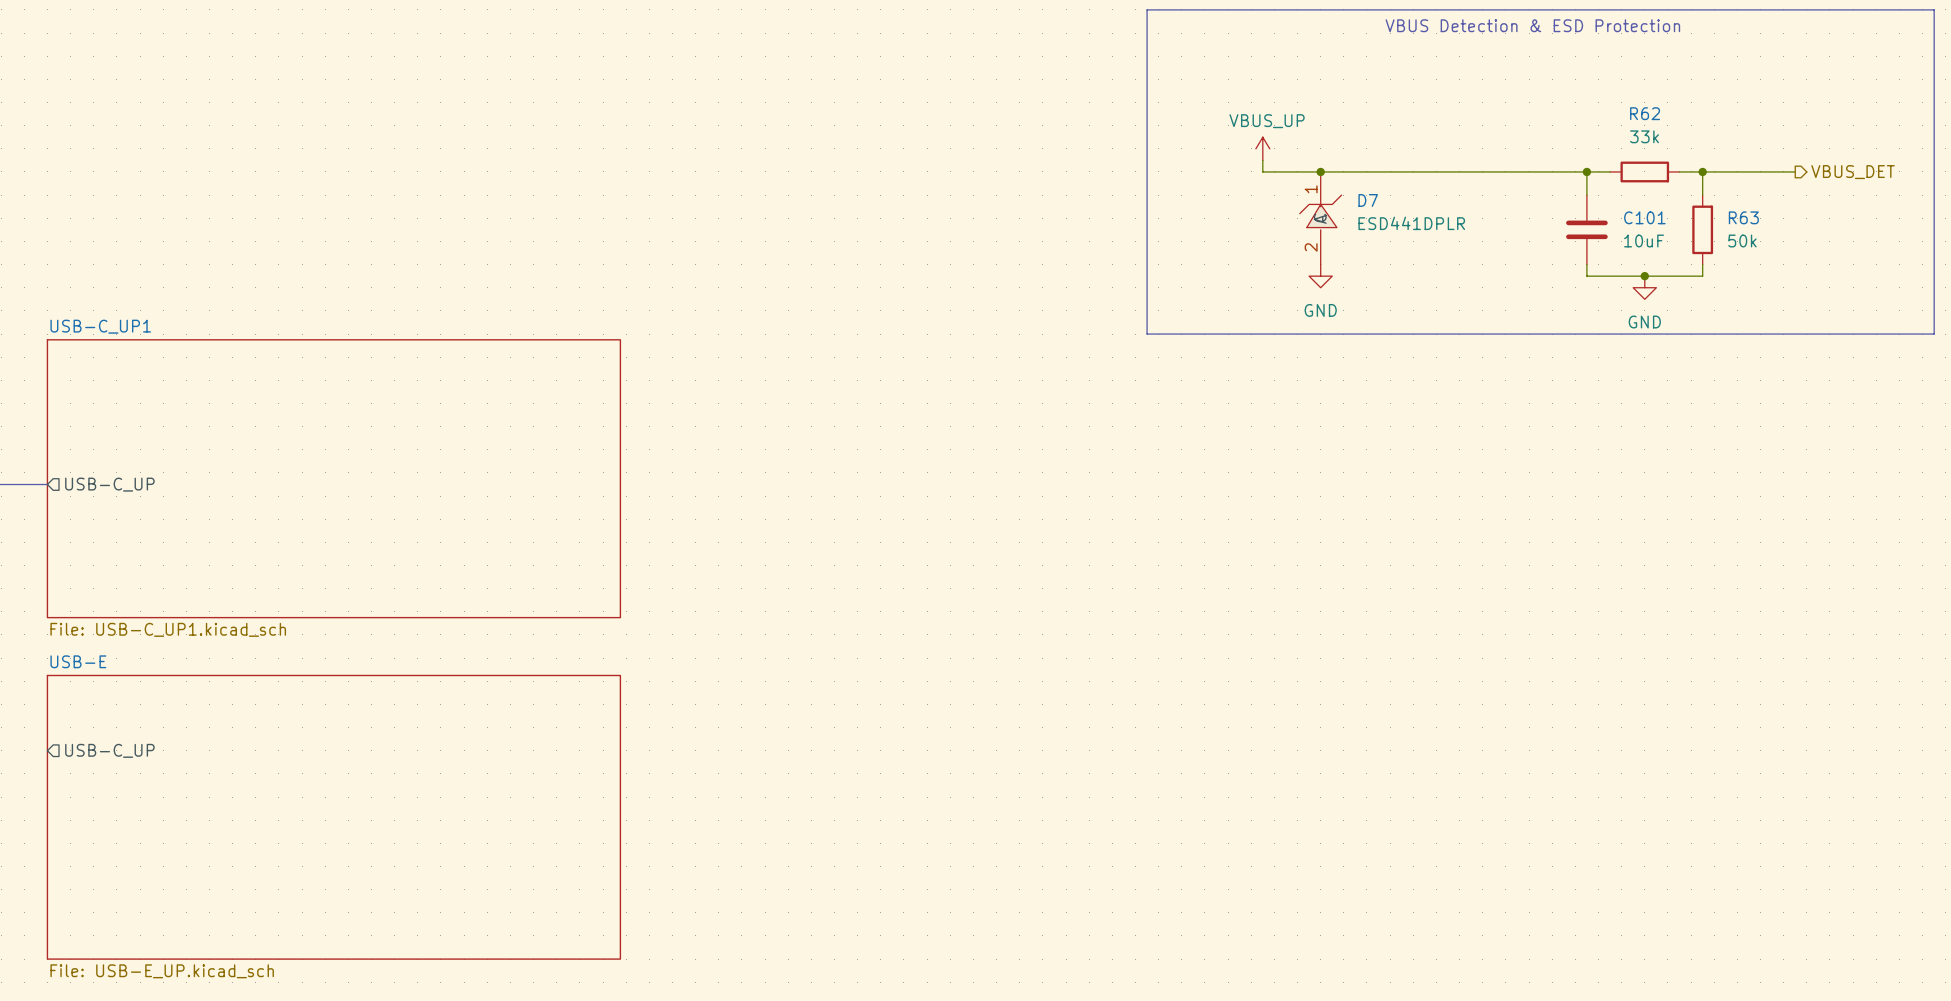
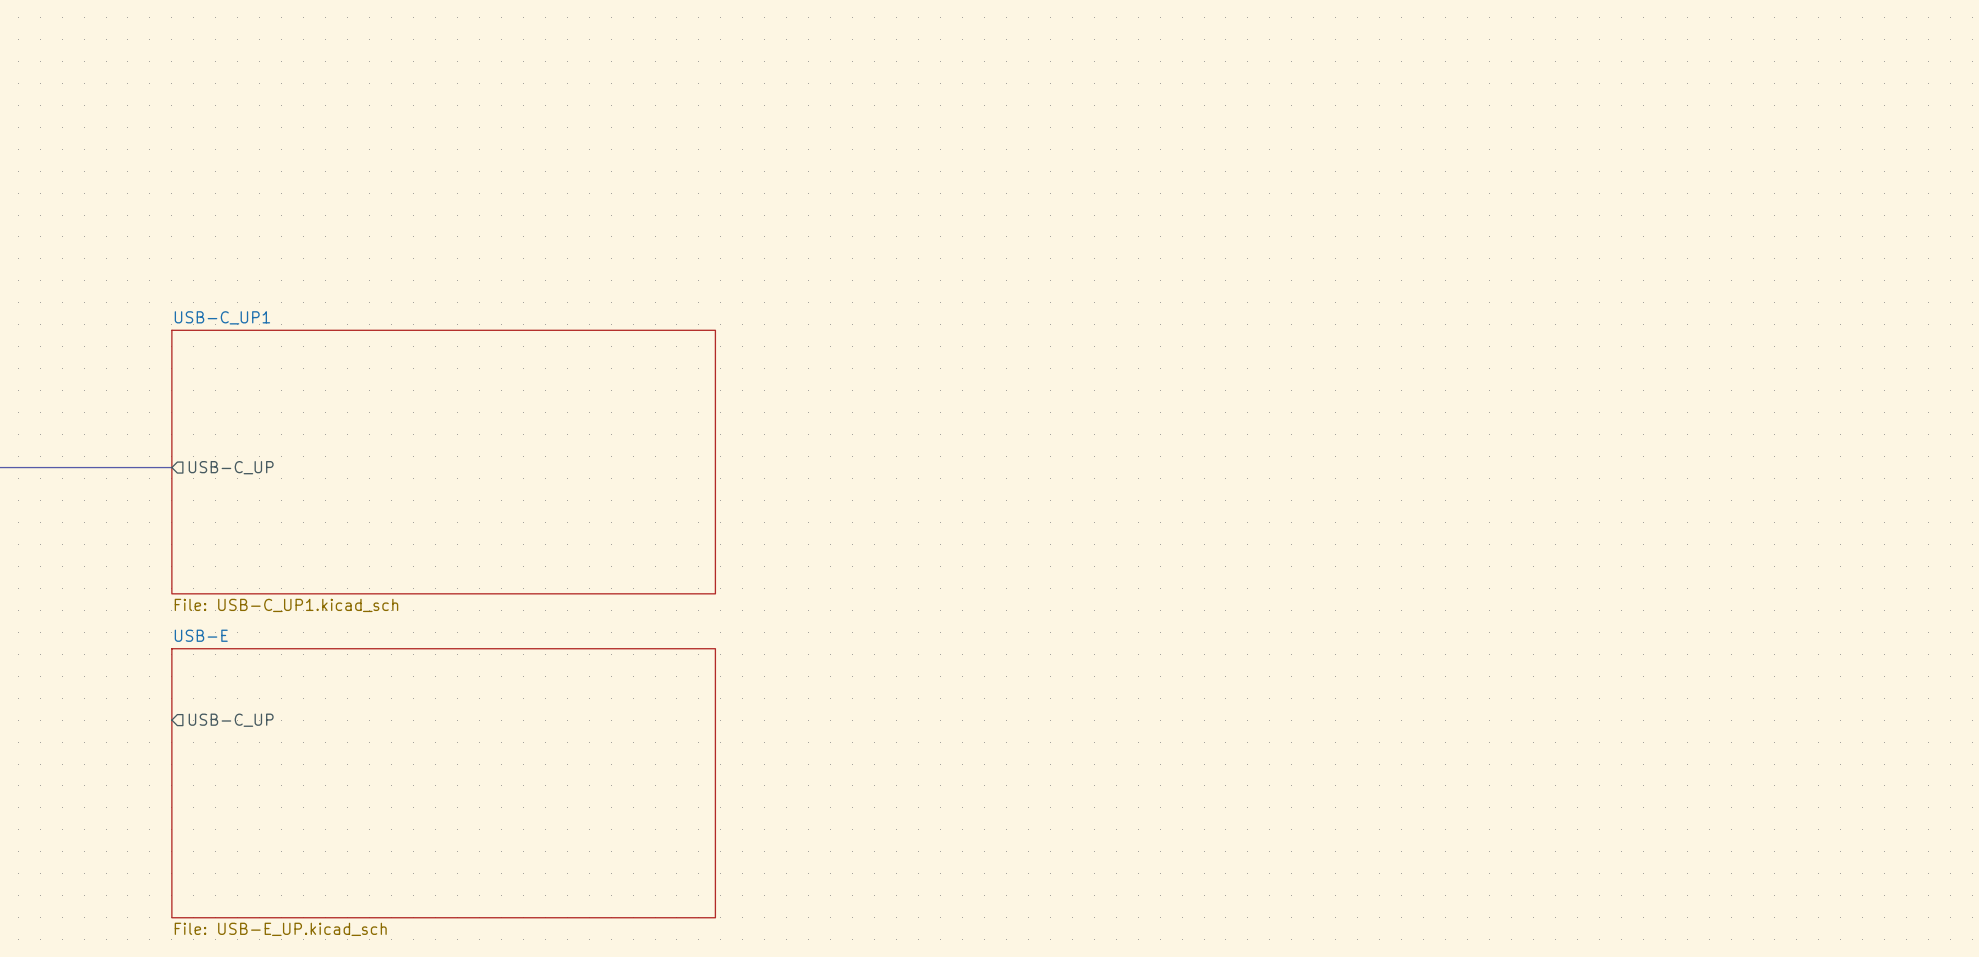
line: (1147, 9) (1934, 9) (1934, 334) (1147, 334) (1147, 9) -> none
text: VBUS Detection & ESD Protection (1532, 25) -> none
power symbol: VBUS_UP (1262, 148) -> none
wire: (1262, 160) (1262, 171) (1610, 171) -> none
junction: (1320, 171) -> none
wire: (1586, 171) (1586, 195) -> none
junction: (1586, 171) -> none
R62: 33k (1644, 171) -> none
wire: (1679, 171) (1795, 171) -> none
wire: (1702, 171) (1702, 195) -> none
junction: (1702, 171) -> none
hierarchical label: VBUS_DET (1853, 172) -> none
D7: ESD441DPLR (1320, 218) -> none
C101: 10uF (1586, 229) -> none
R63: 50k (1702, 229) -> none
wire: (1586, 264) (1586, 276) (1702, 276) (1702, 264) -> none
power symbol: GND (1320, 276) -> none
junction: (1644, 276) -> none
power symbol: GND (1644, 287) -> none

